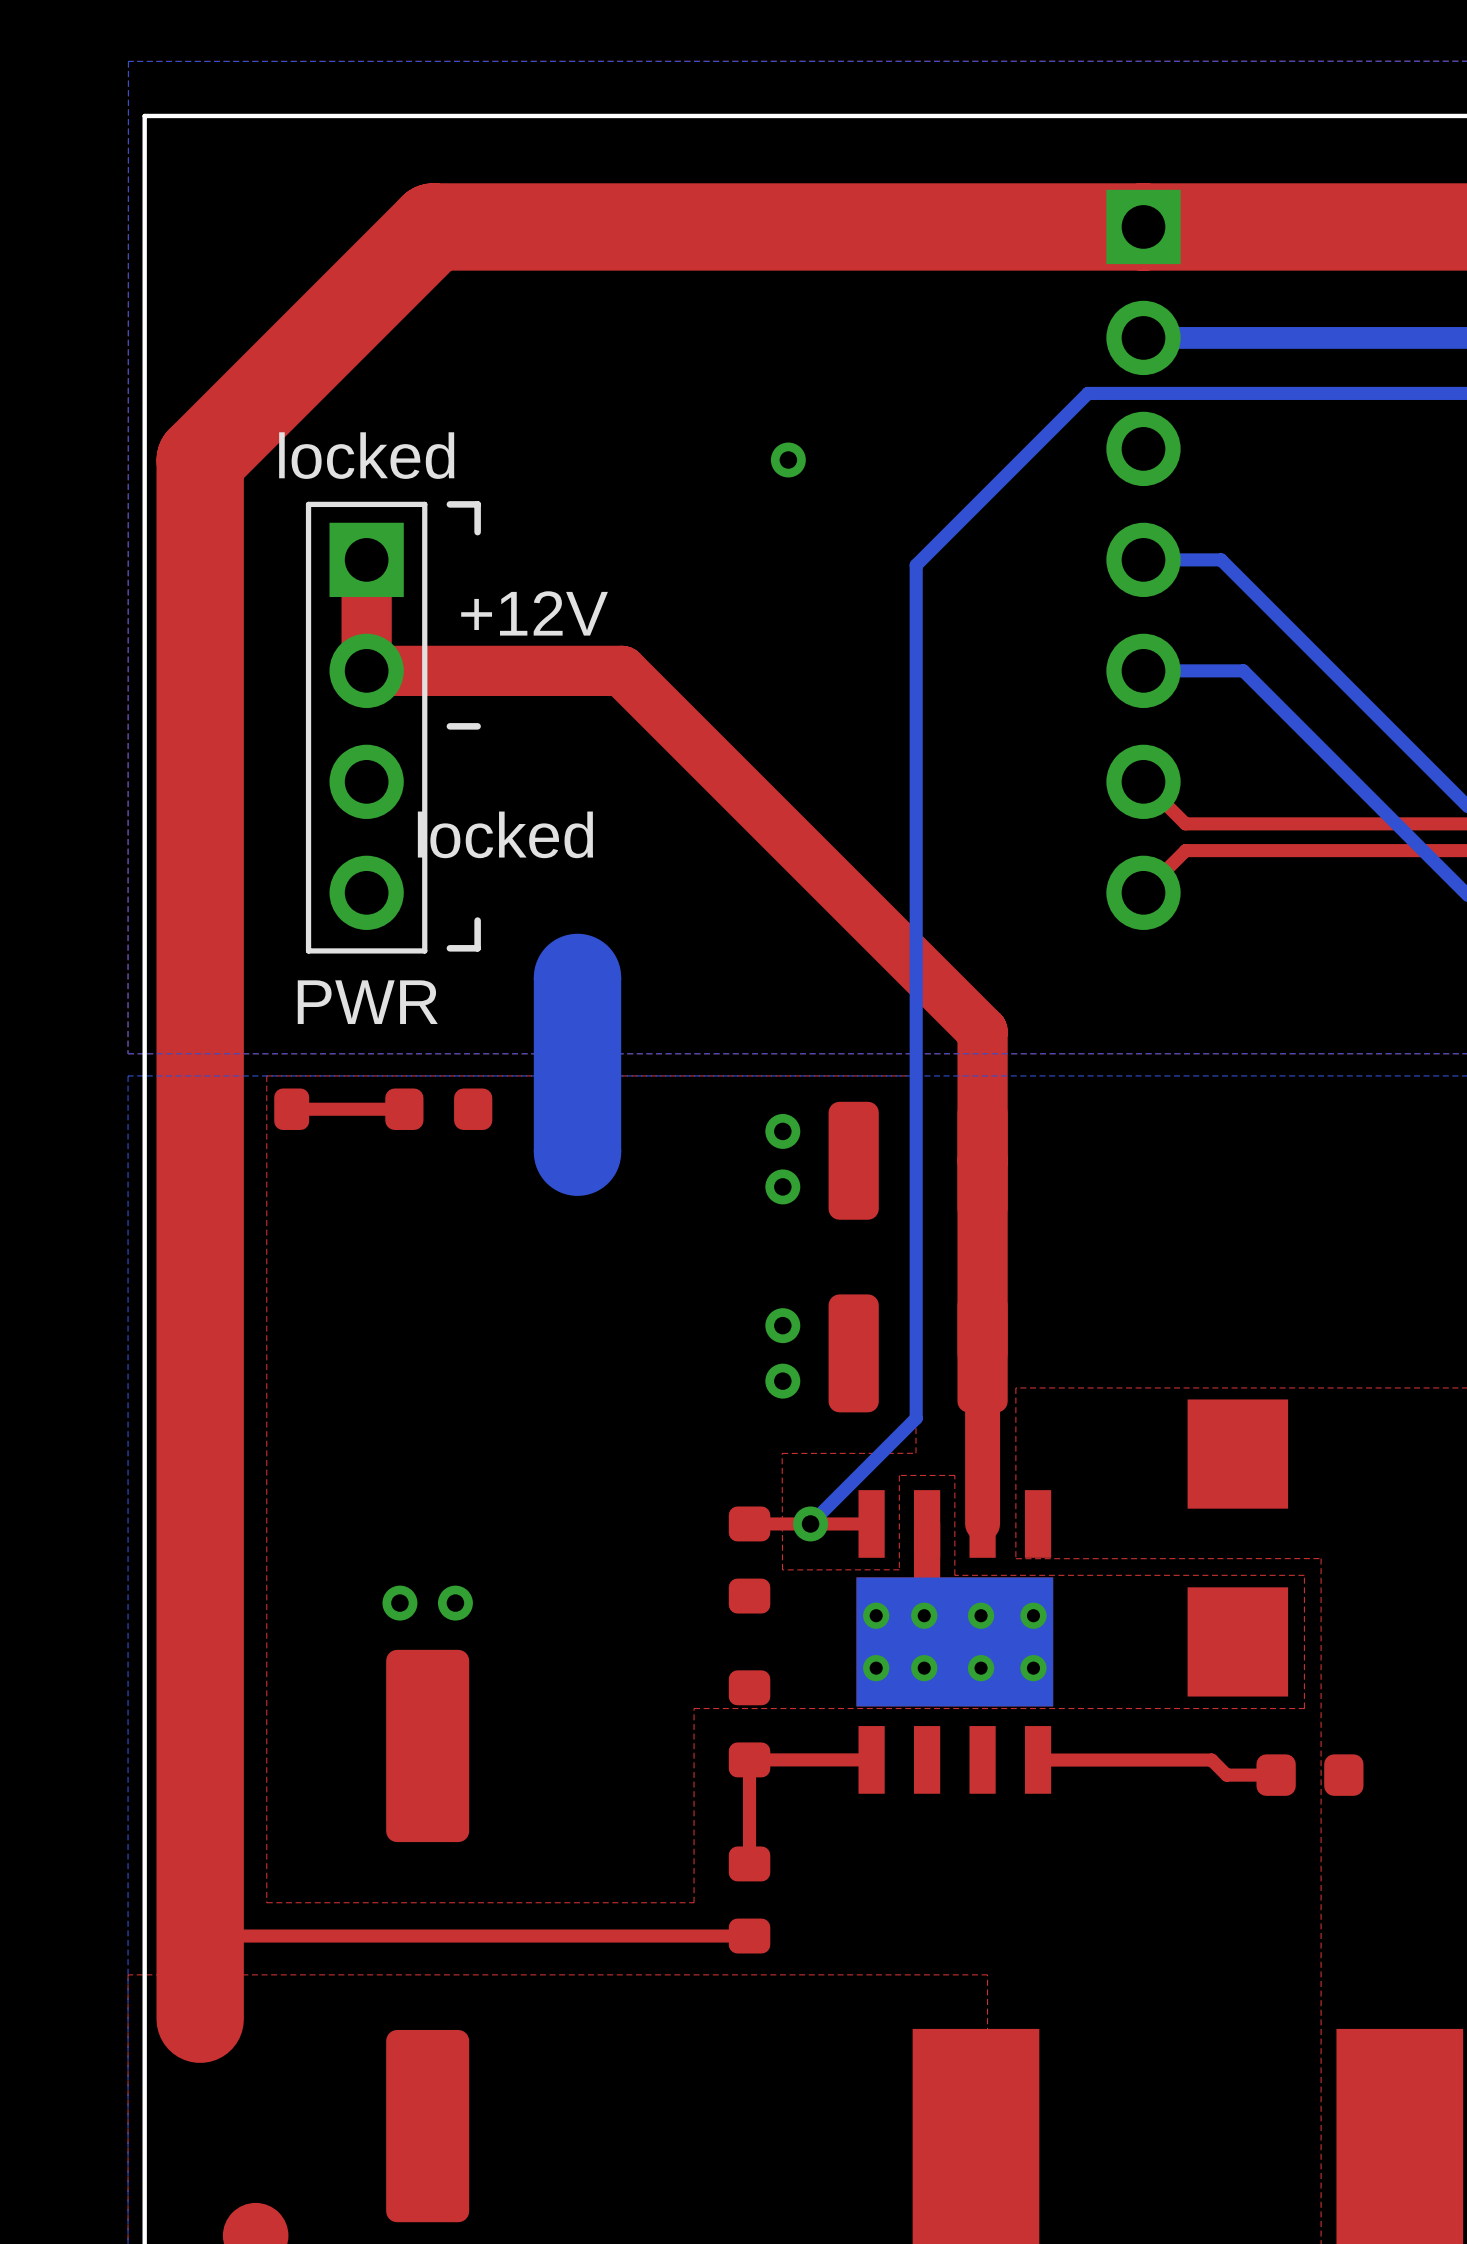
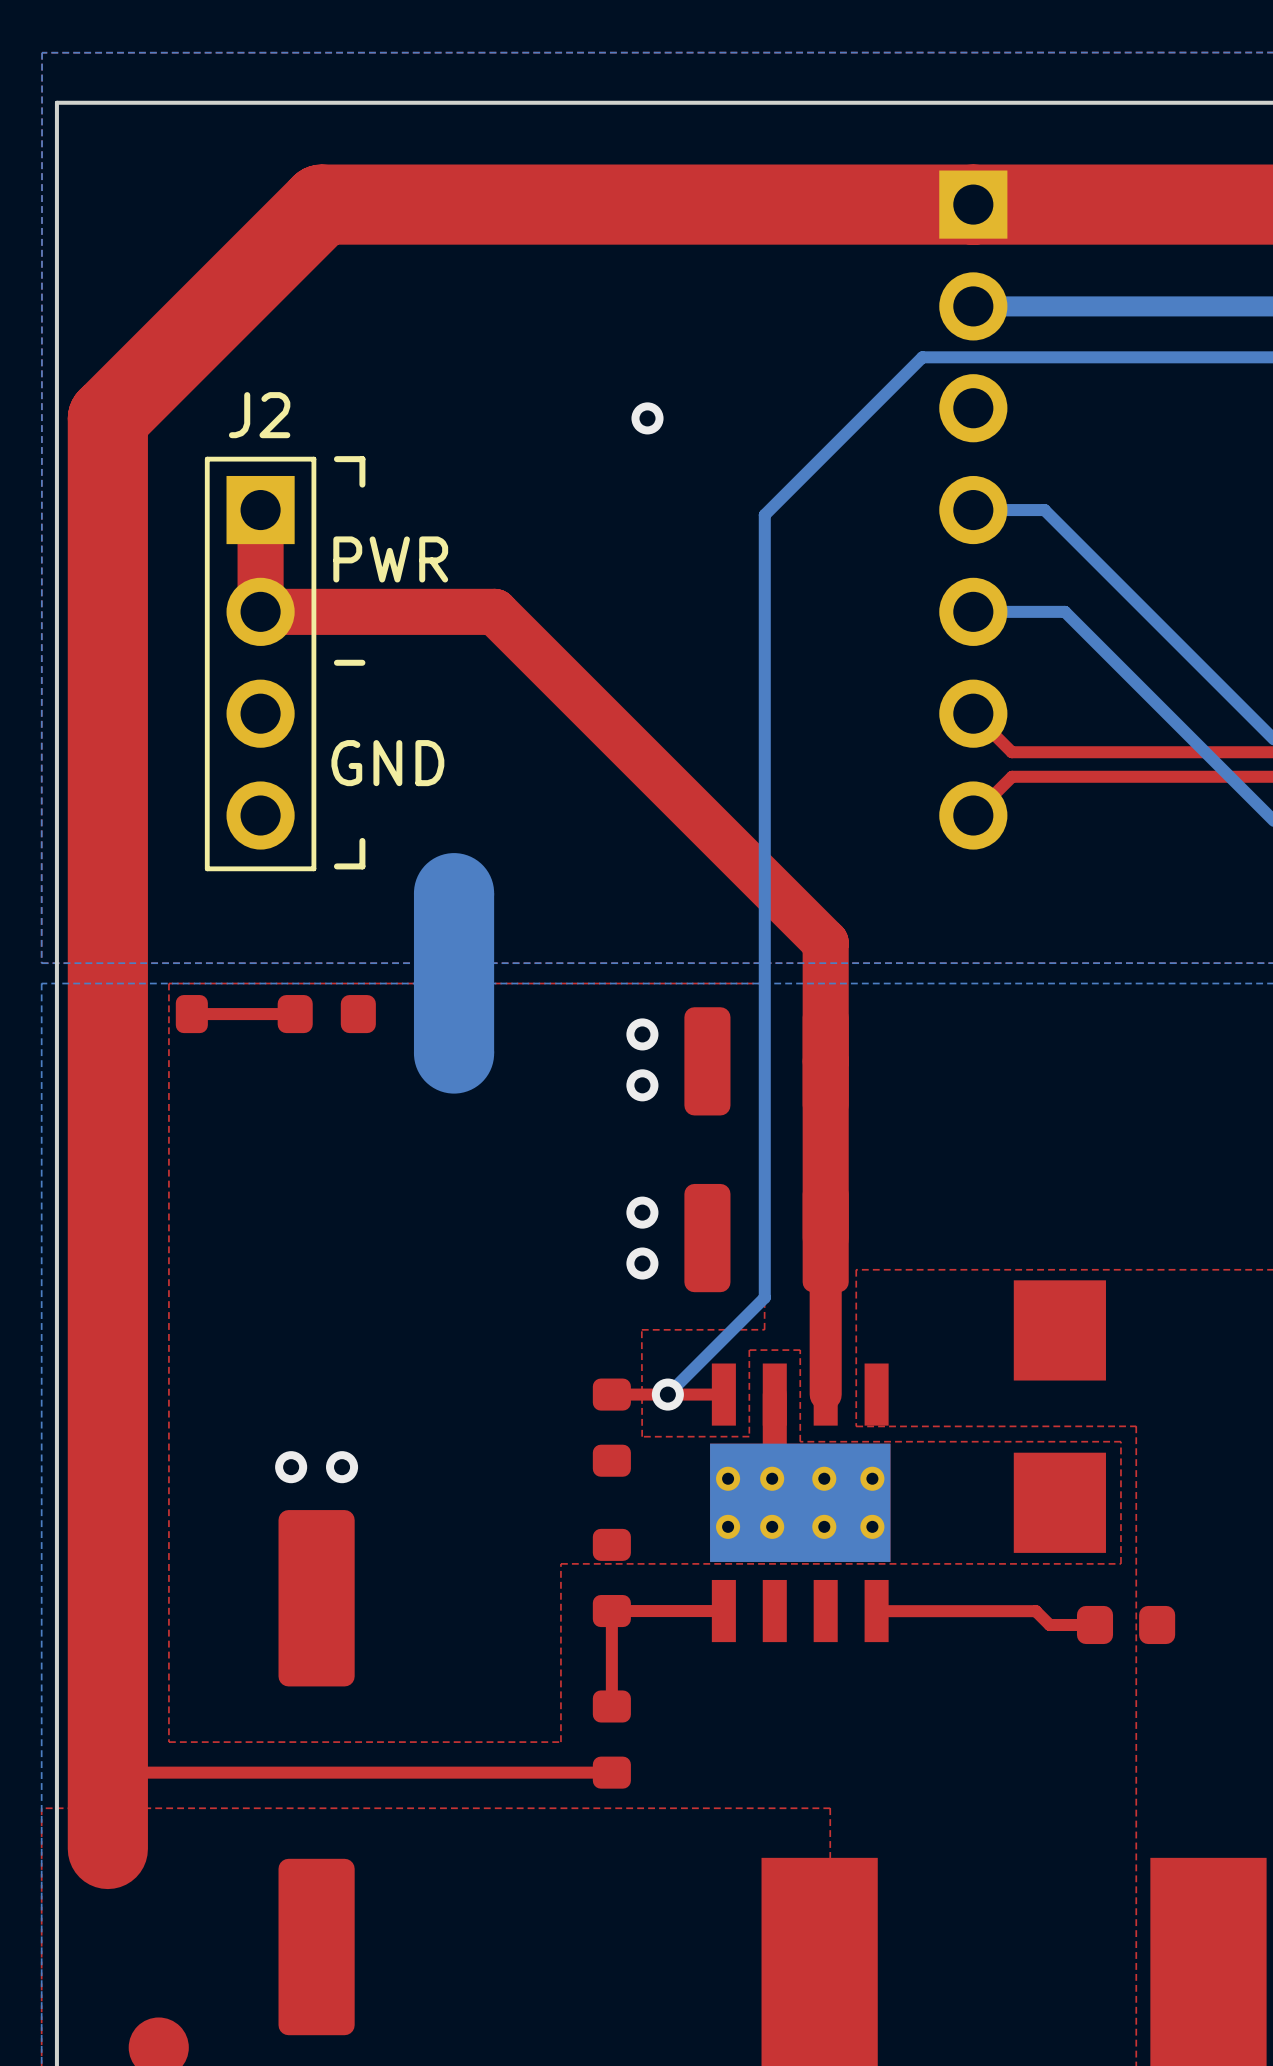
locked name: locked (366, 455) -> J2 (259, 415)
locked text: none -> PWR (390, 559)
locked text: +12V (534, 613) -> none
locked text: locked (505, 834) -> GND (387, 763)
locked value: PWR (367, 1002) -> none

